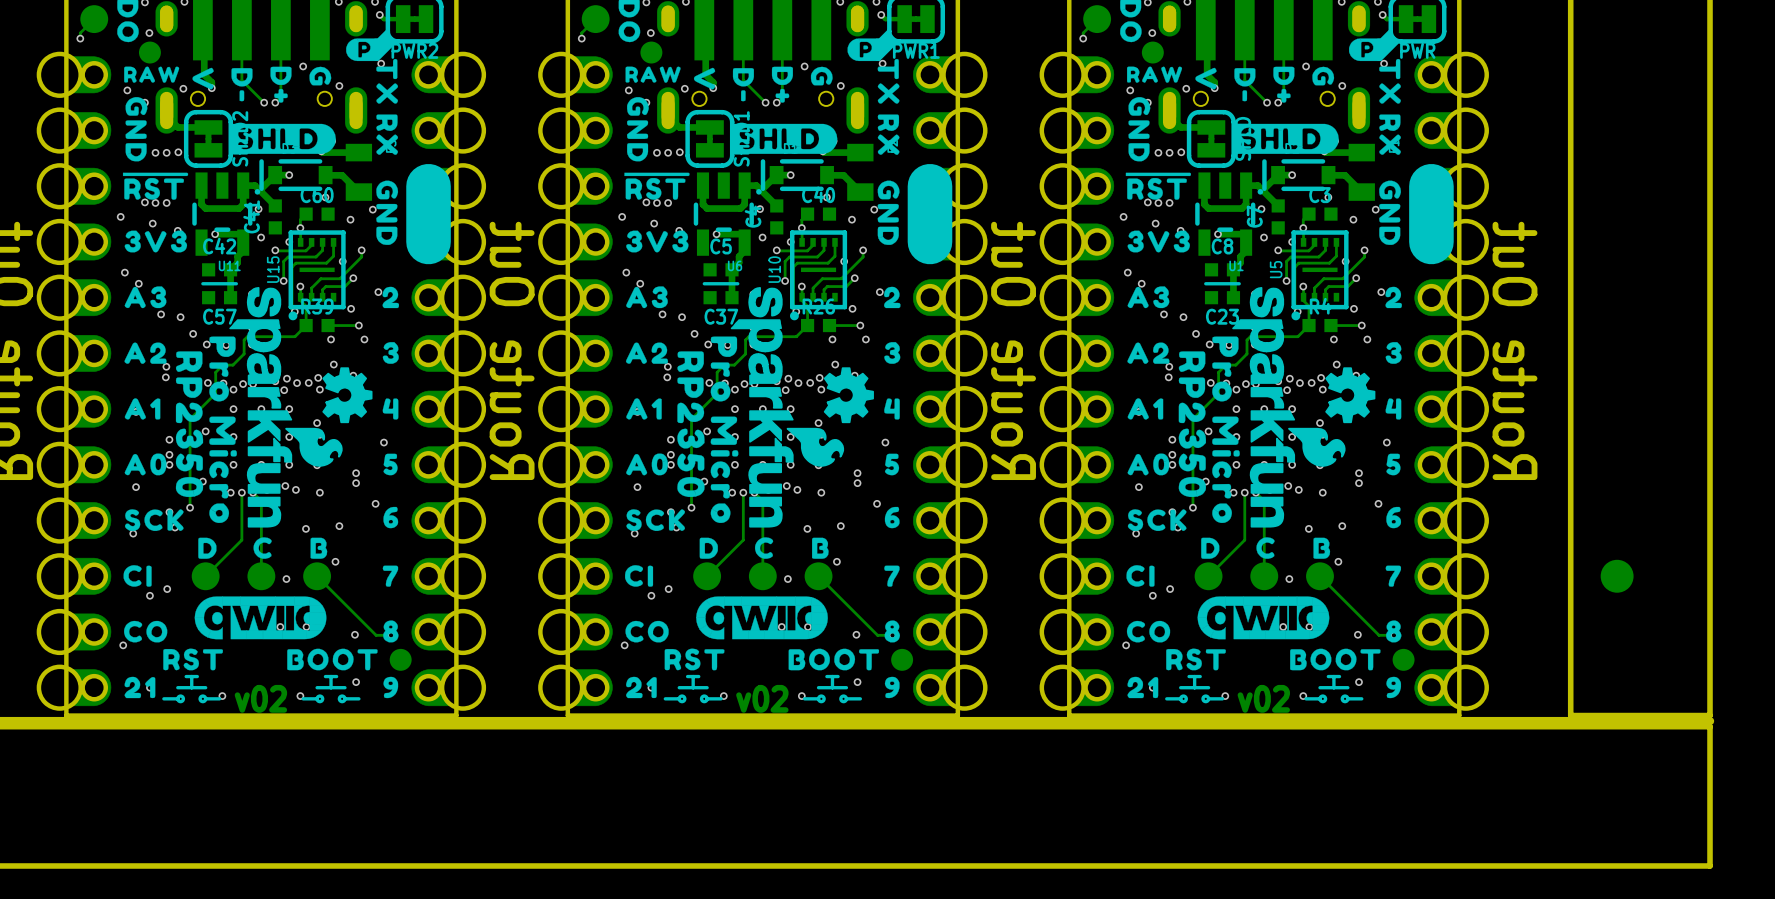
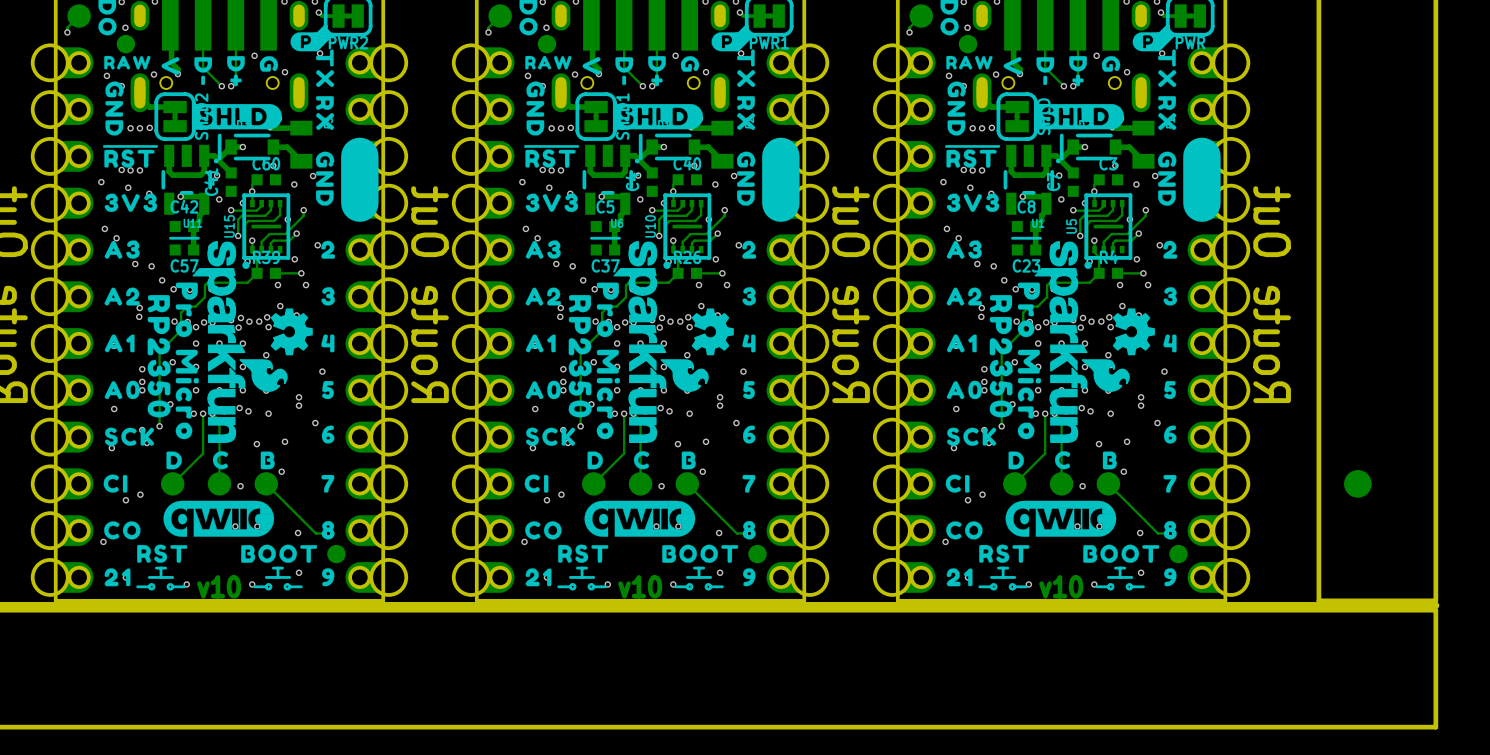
text: v02 (260, 698) -> v10 (219, 586)
text: v02 (762, 698) -> v10 (640, 586)
text: v02 (1263, 698) -> v10 (1061, 586)

